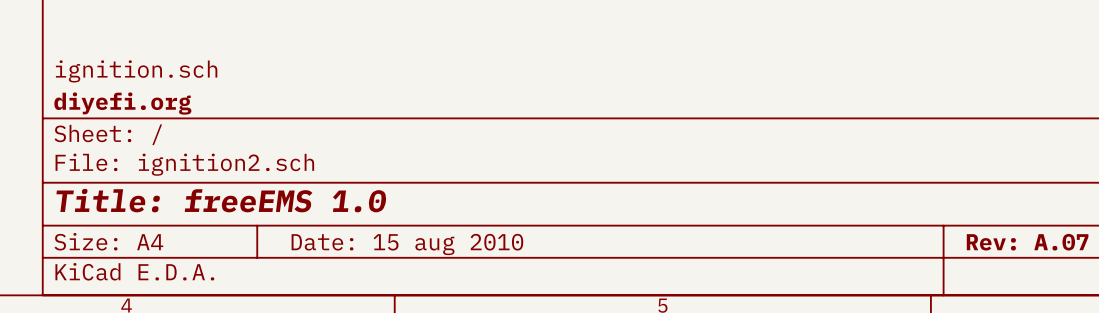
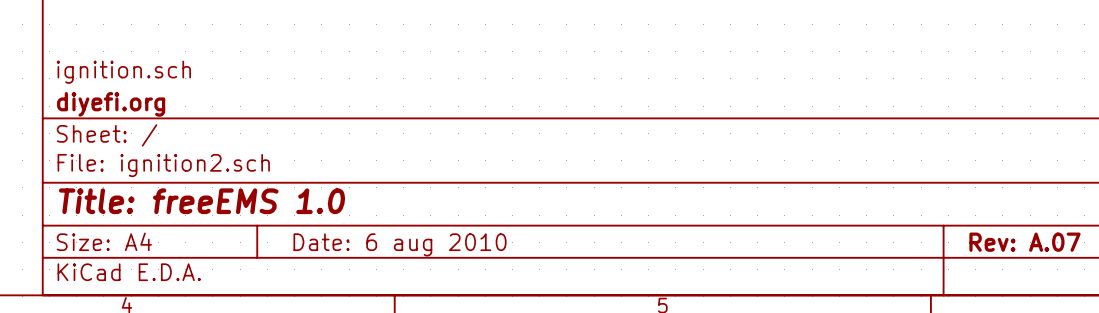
title block: Date: 15 aug 2010 (407, 244) -> Date: 6 aug 2010 (400, 244)

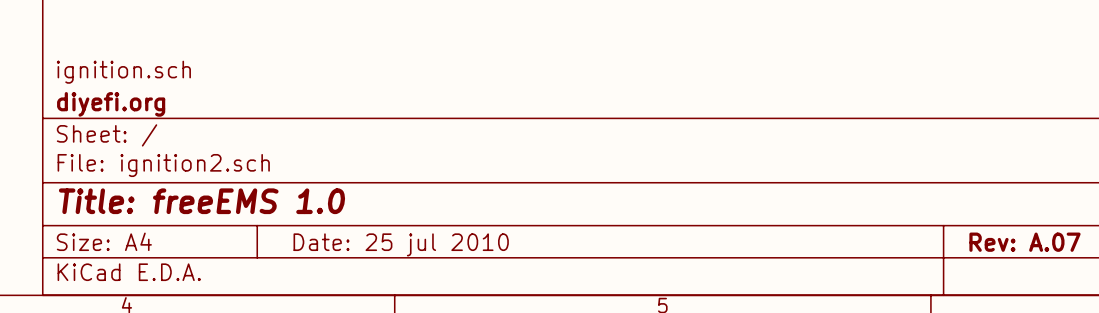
title block: Date: 6 aug 2010 (400, 244) -> Date: 25 jul 2010 (401, 244)

